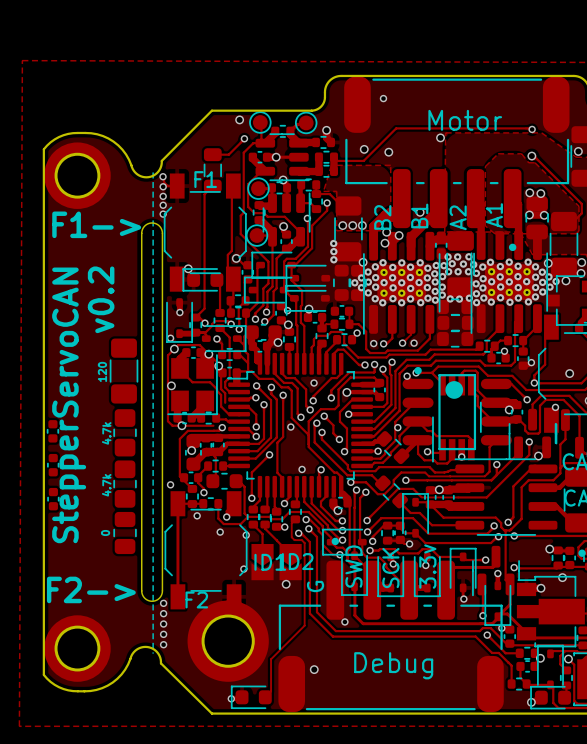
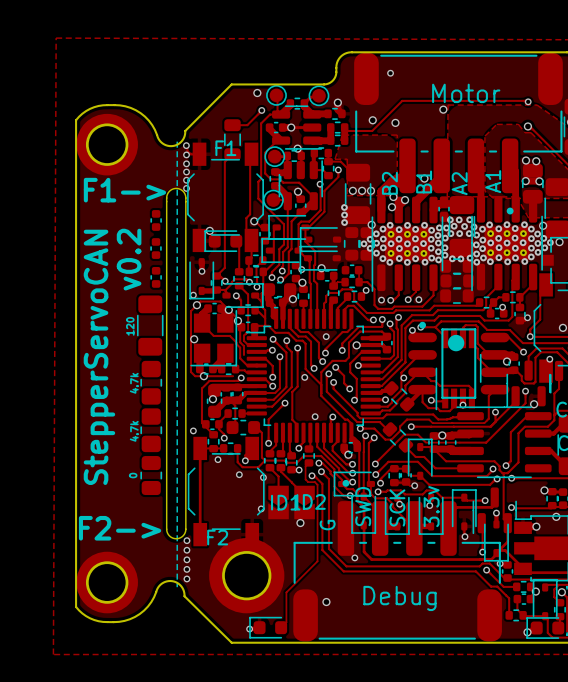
via: none -> (186, 188)
part: none -> (156, 220)
part: none -> (156, 248)
part: none -> (156, 277)
part: (52, 431) -> none
part: (53, 465) -> none
part: (53, 499) -> none

